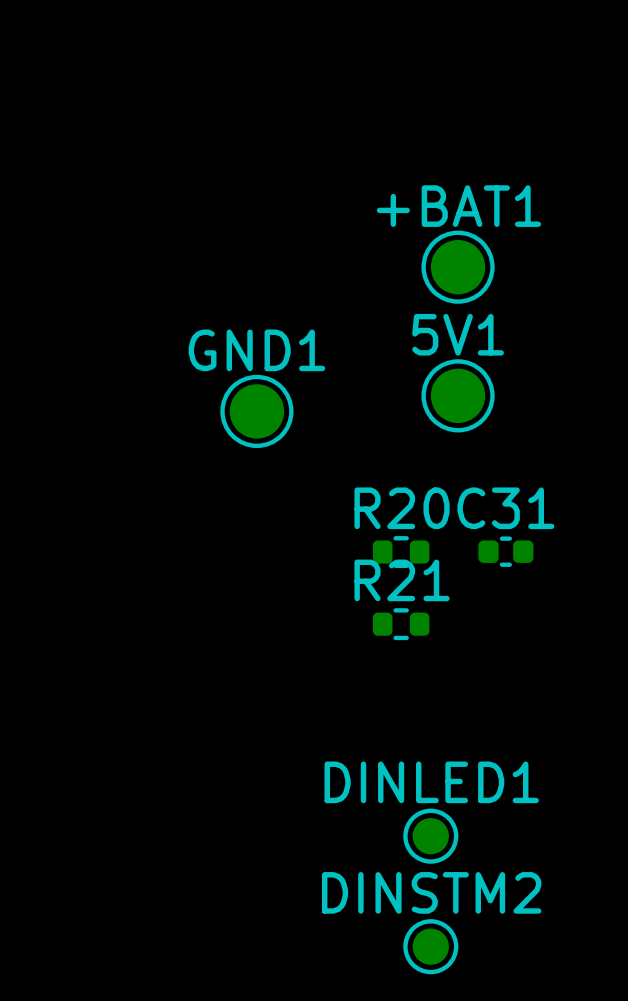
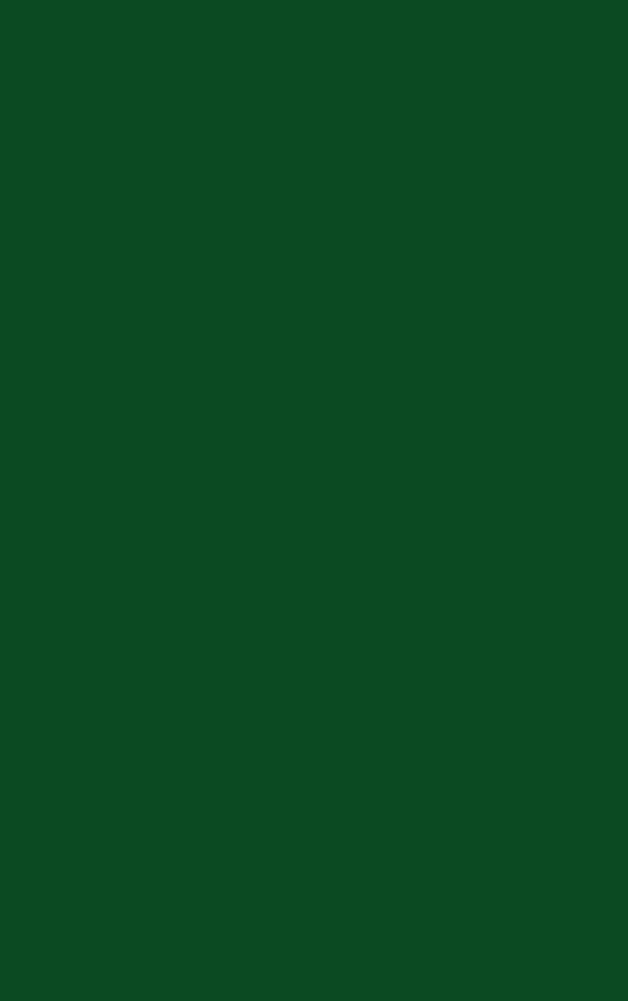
+BAT1: (458, 267) -> none
5V1: (458, 395) -> none
GND1: (256, 411) -> none
C31: (505, 551) -> none
R20: (401, 552) -> none
R21: (401, 624) -> none
DINLED1: (430, 836) -> none
DINSTM2: (430, 946) -> none

